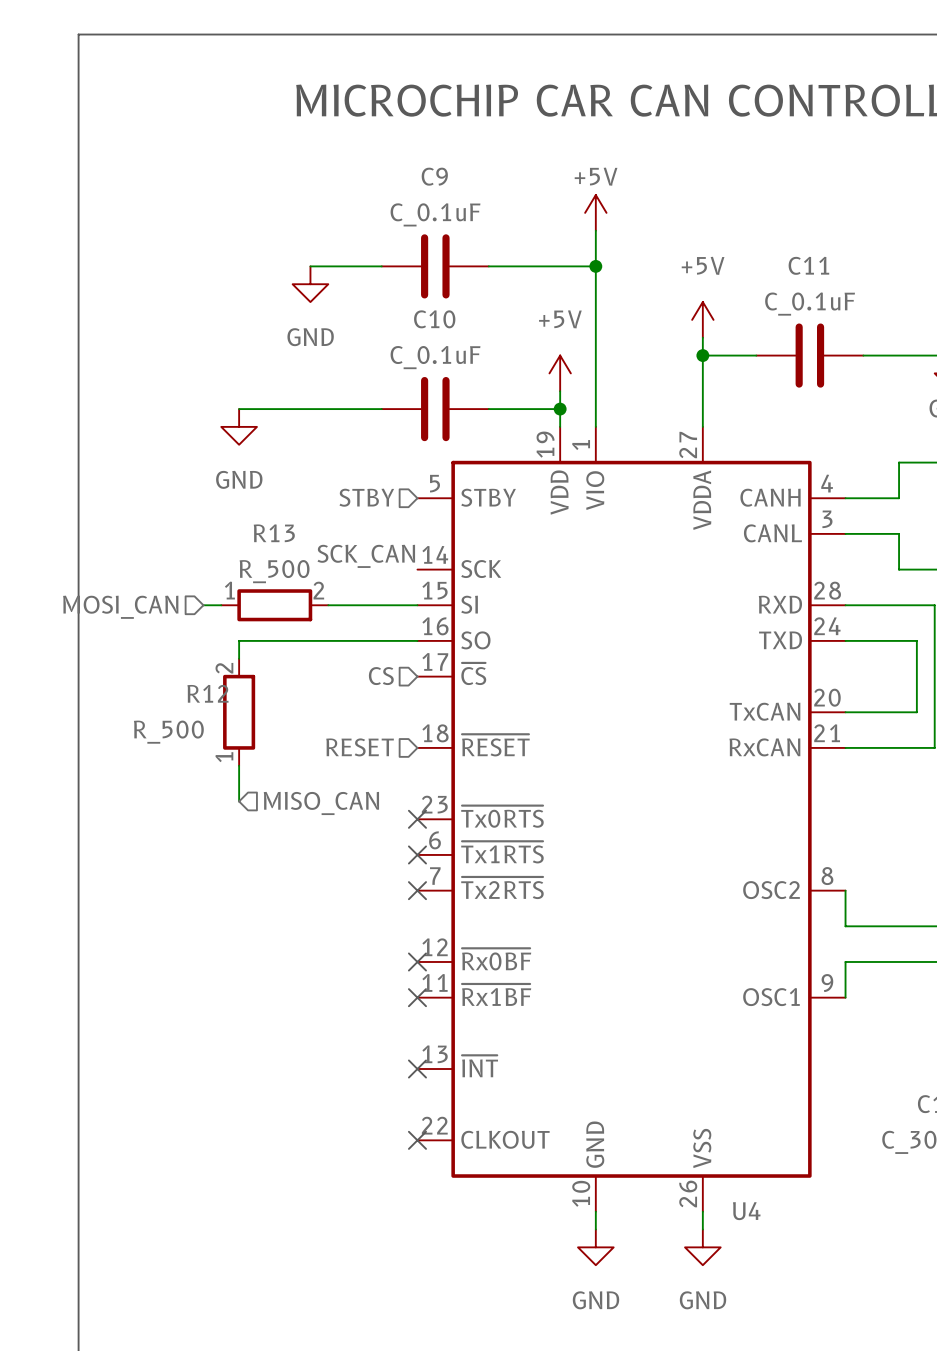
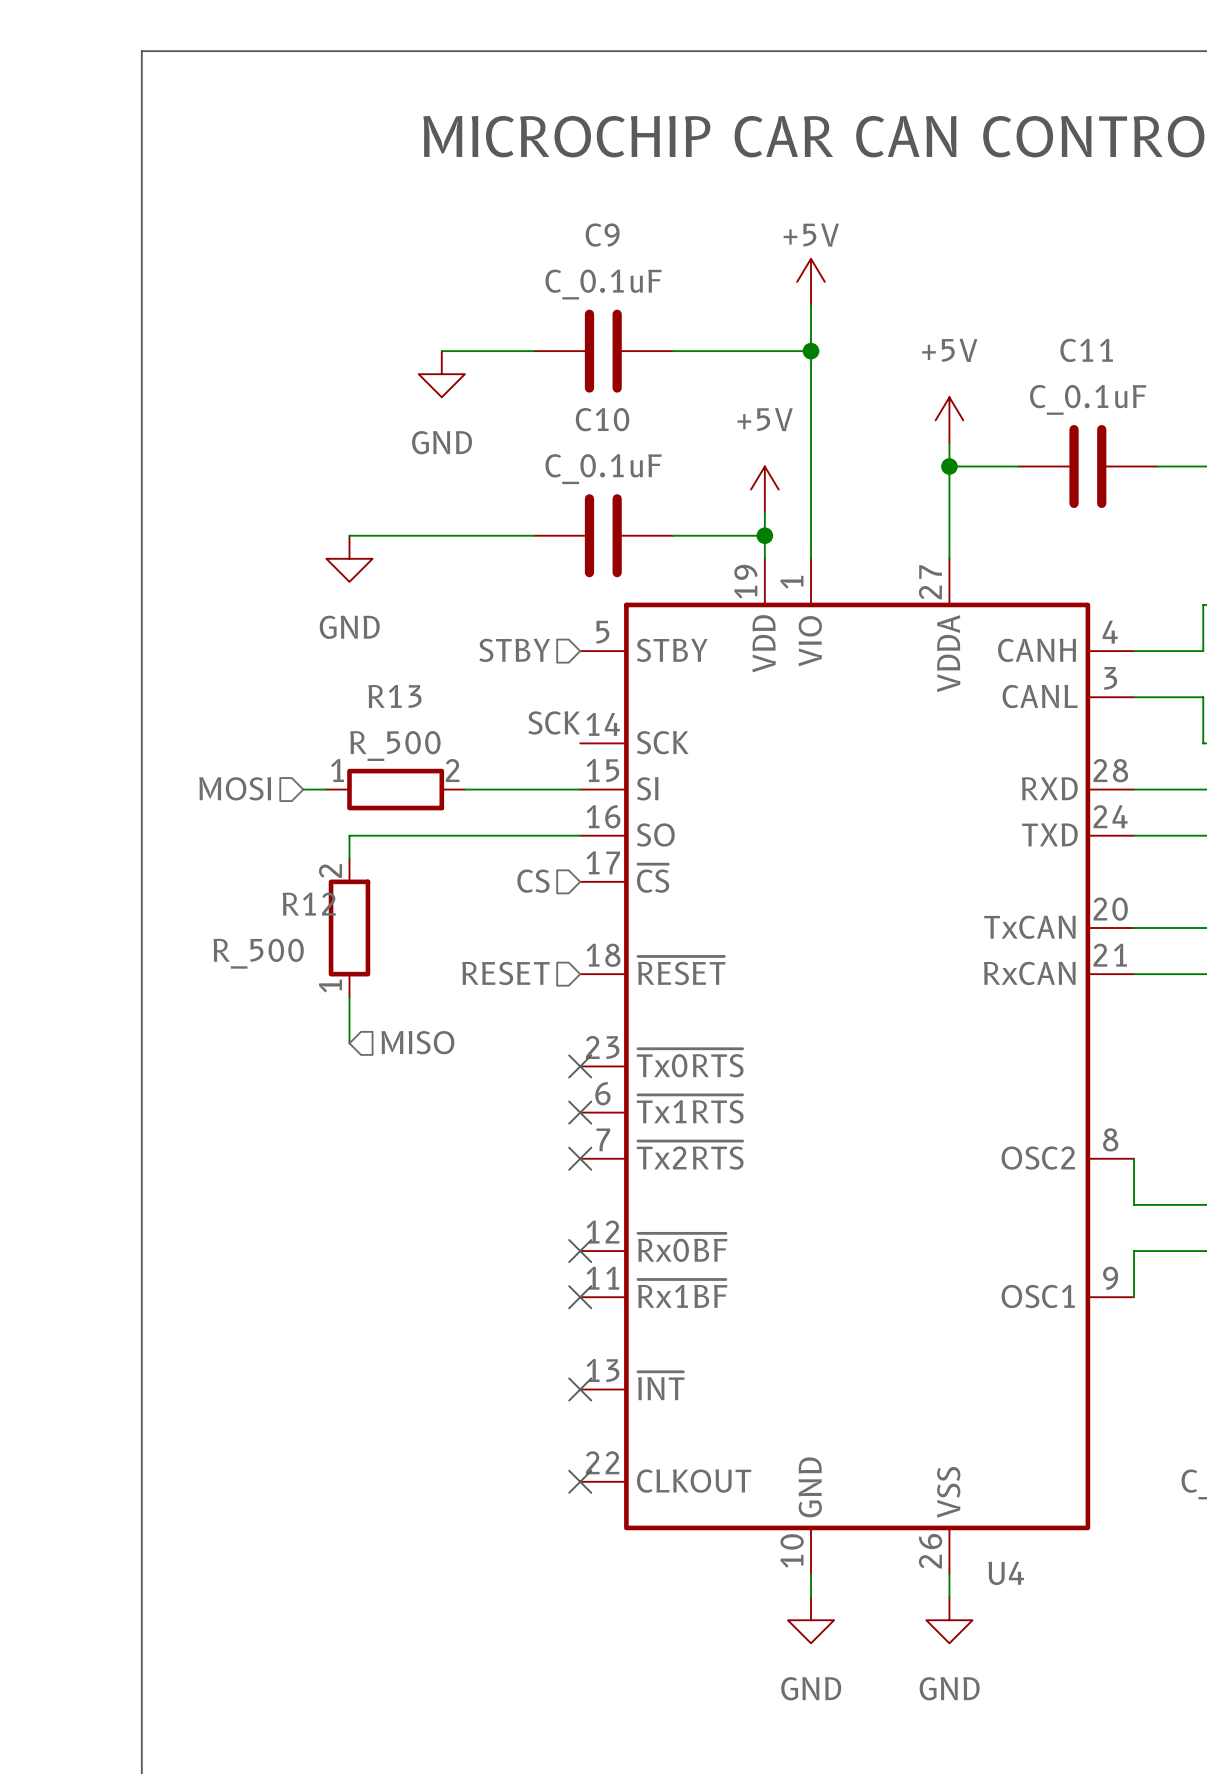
label: SCK_CAN (366, 556) -> SCK (554, 722)
hierarchical label: MOSI_CAN (120, 607) -> MOSI (235, 788)
hierarchical label: MISO_CAN (321, 803) -> MISO (417, 1042)

